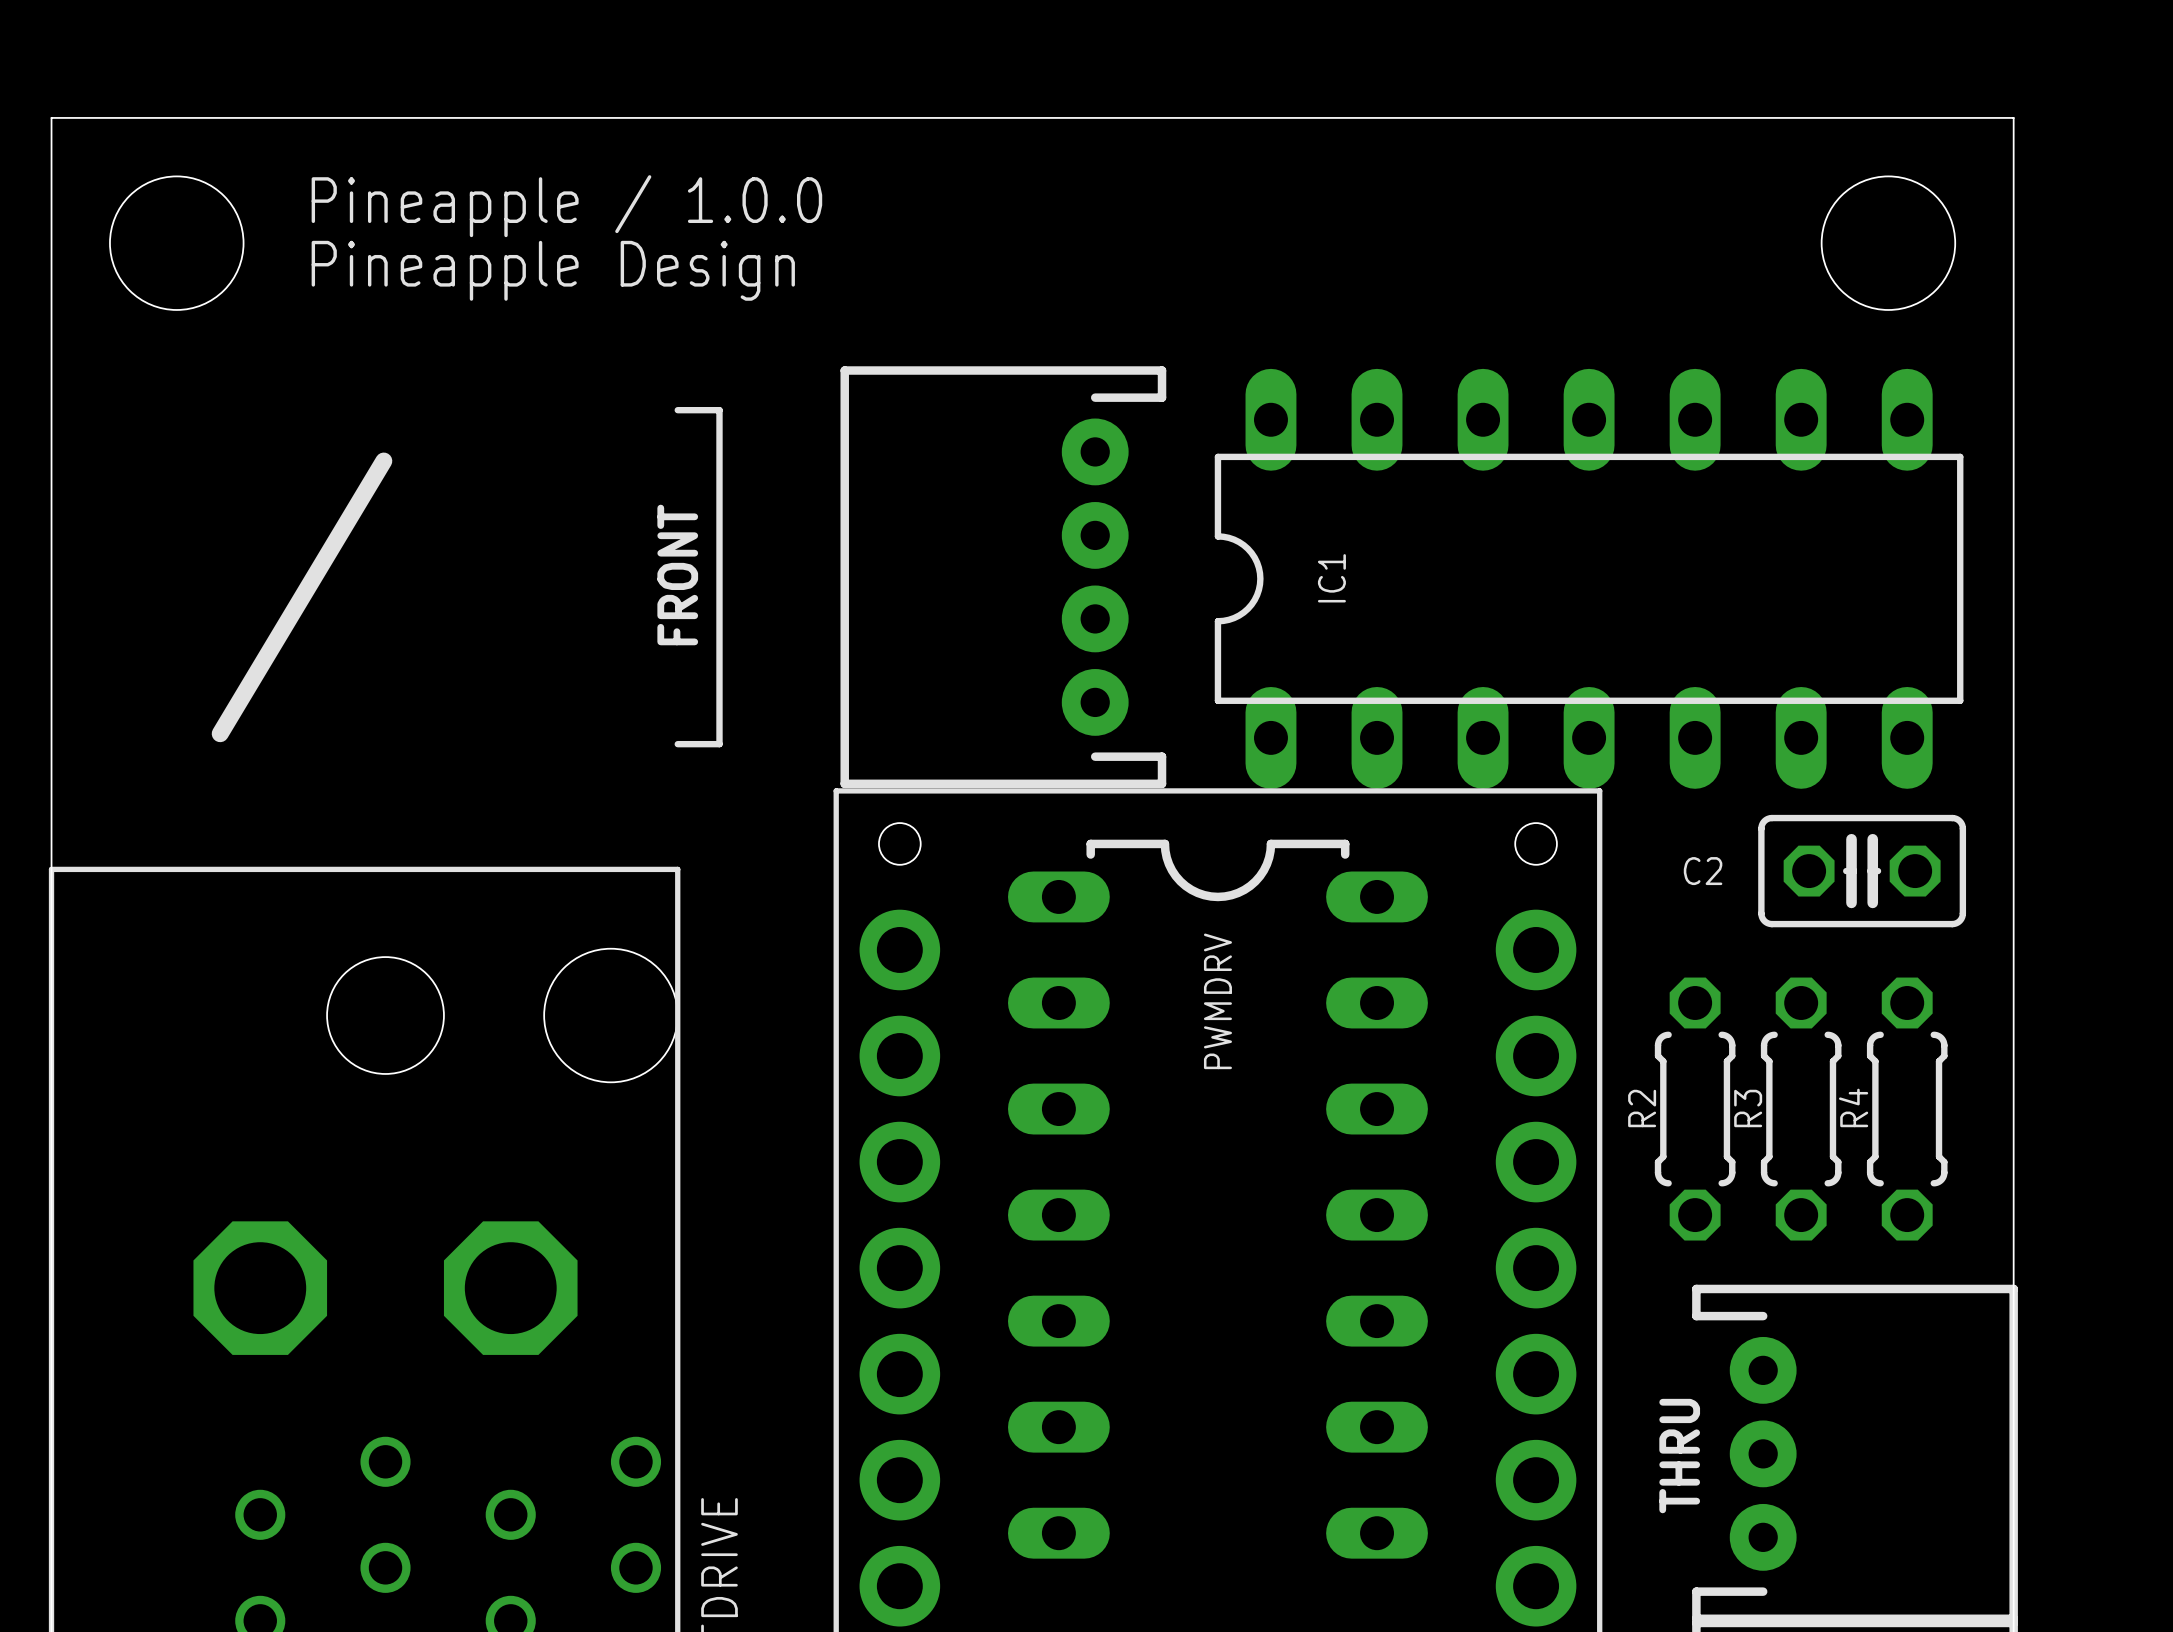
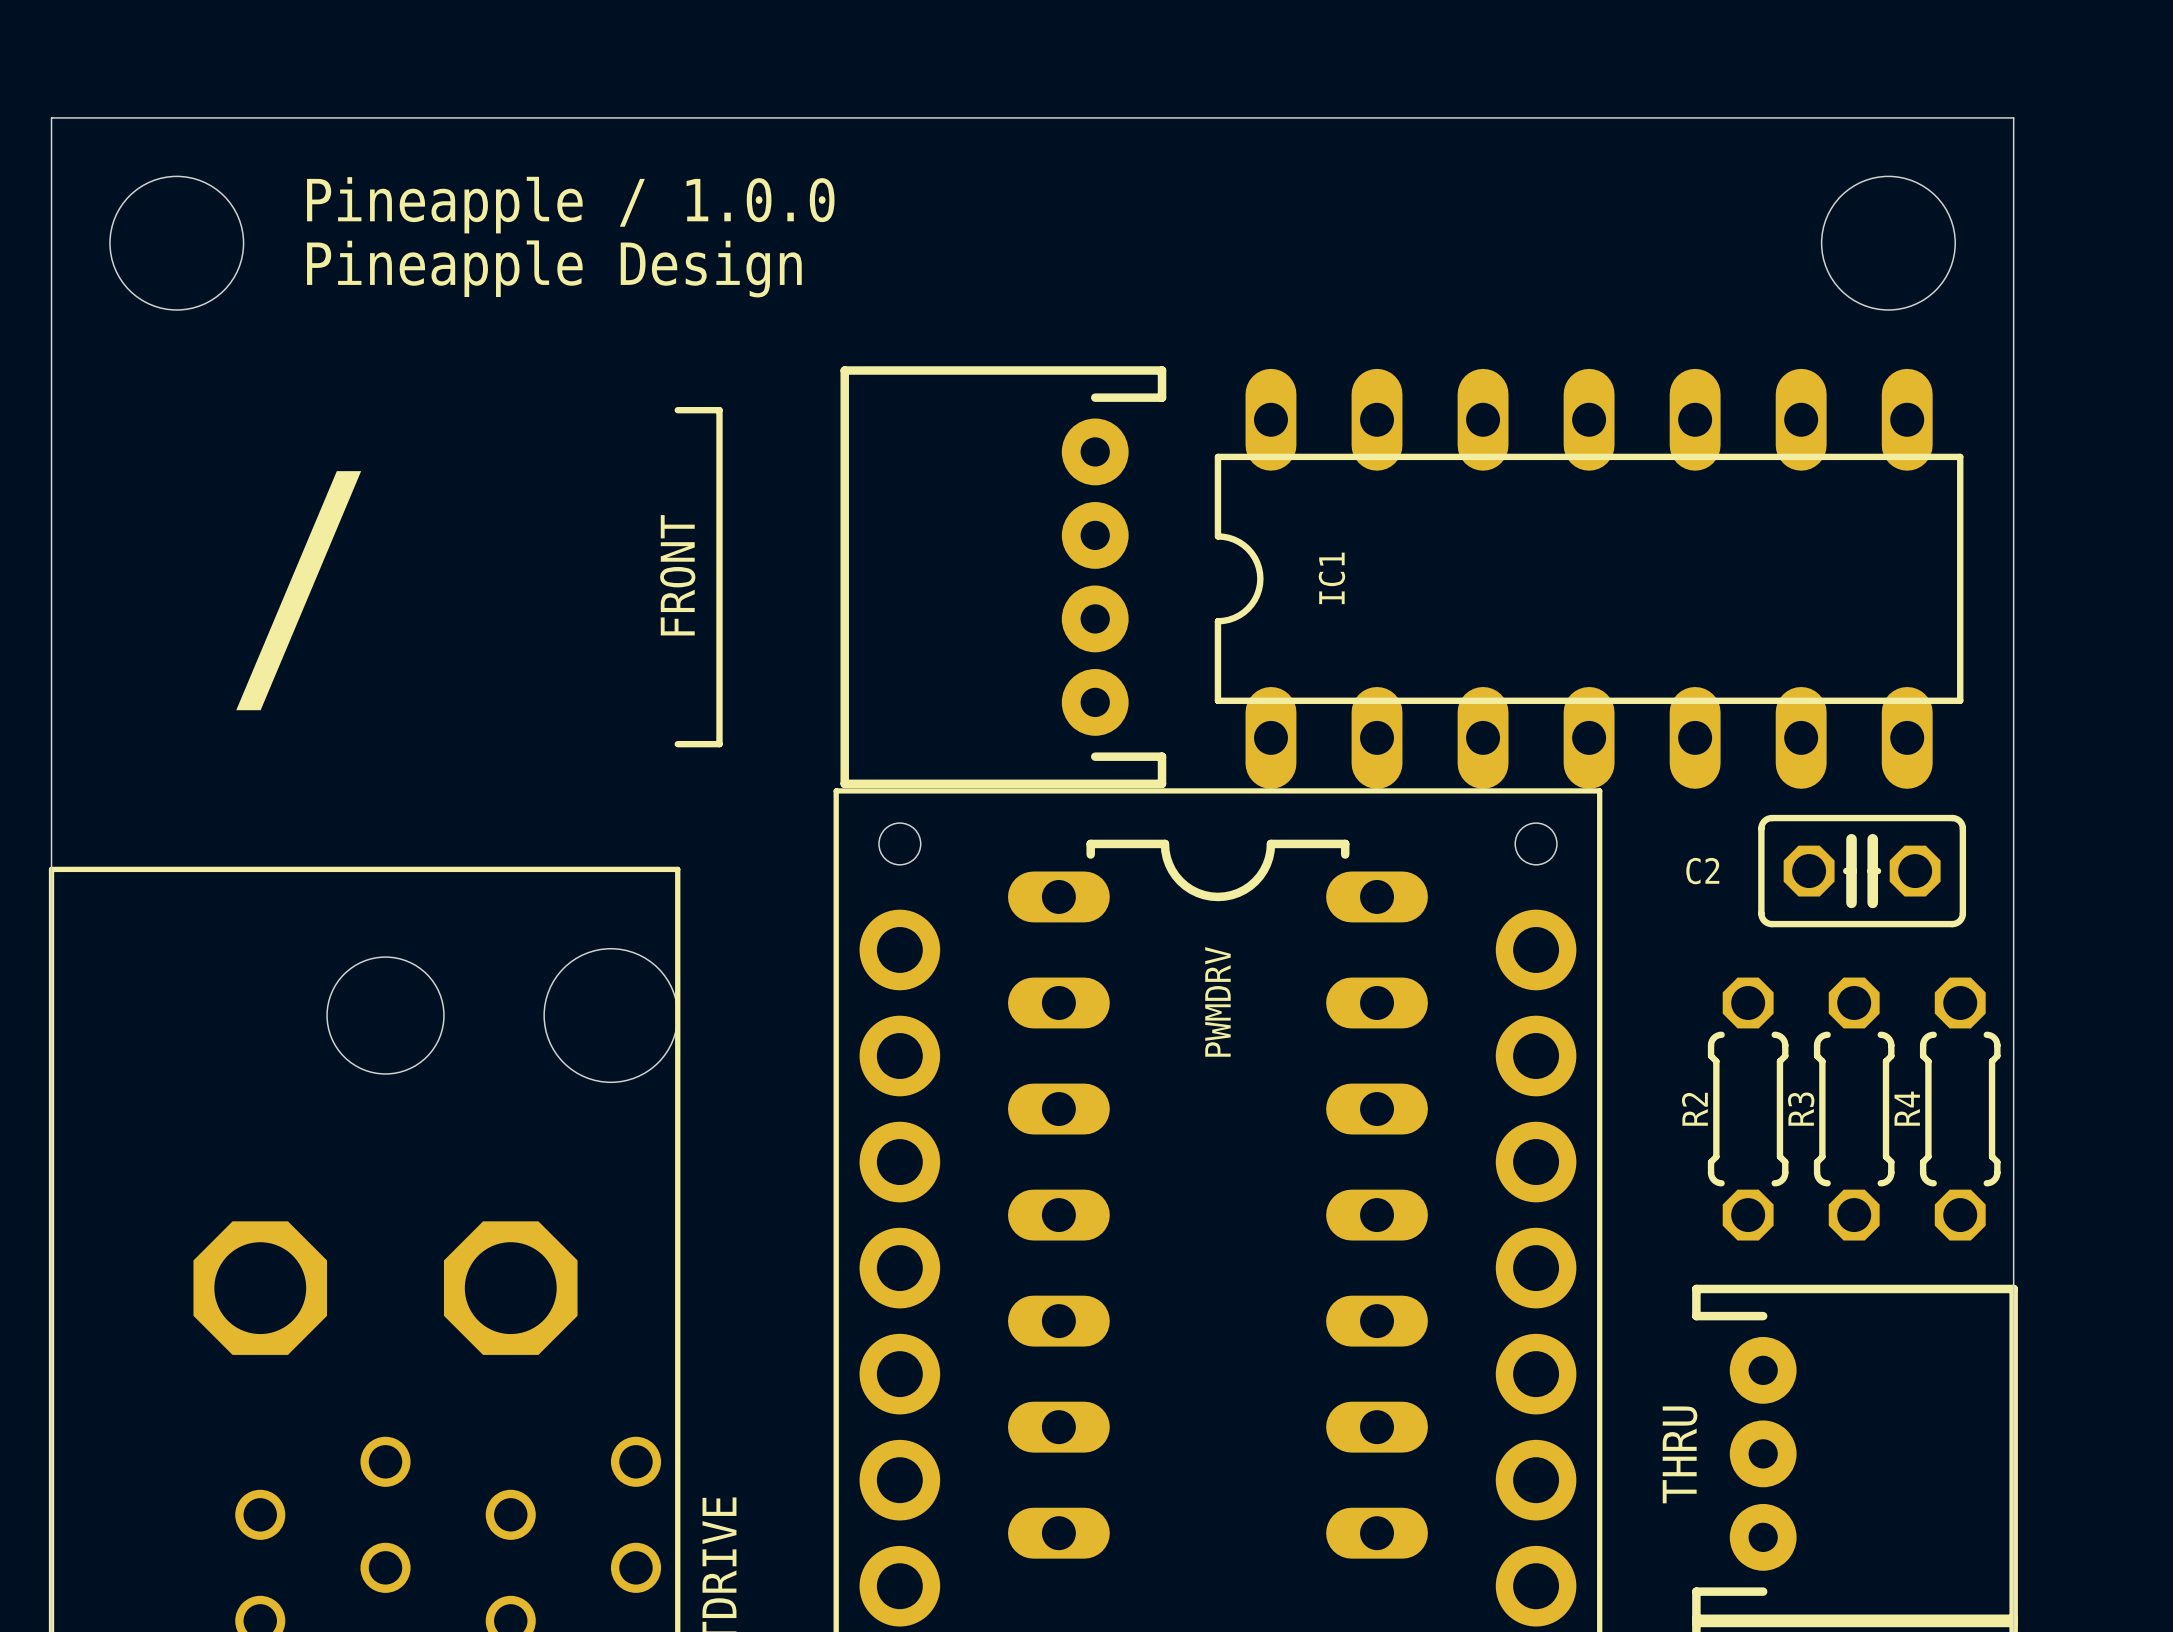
R2 position: (1695, 1109) -> (1748, 1109)
R3 position: (1801, 1109) -> (1854, 1109)
R4 position: (1907, 1109) -> (1960, 1109)

